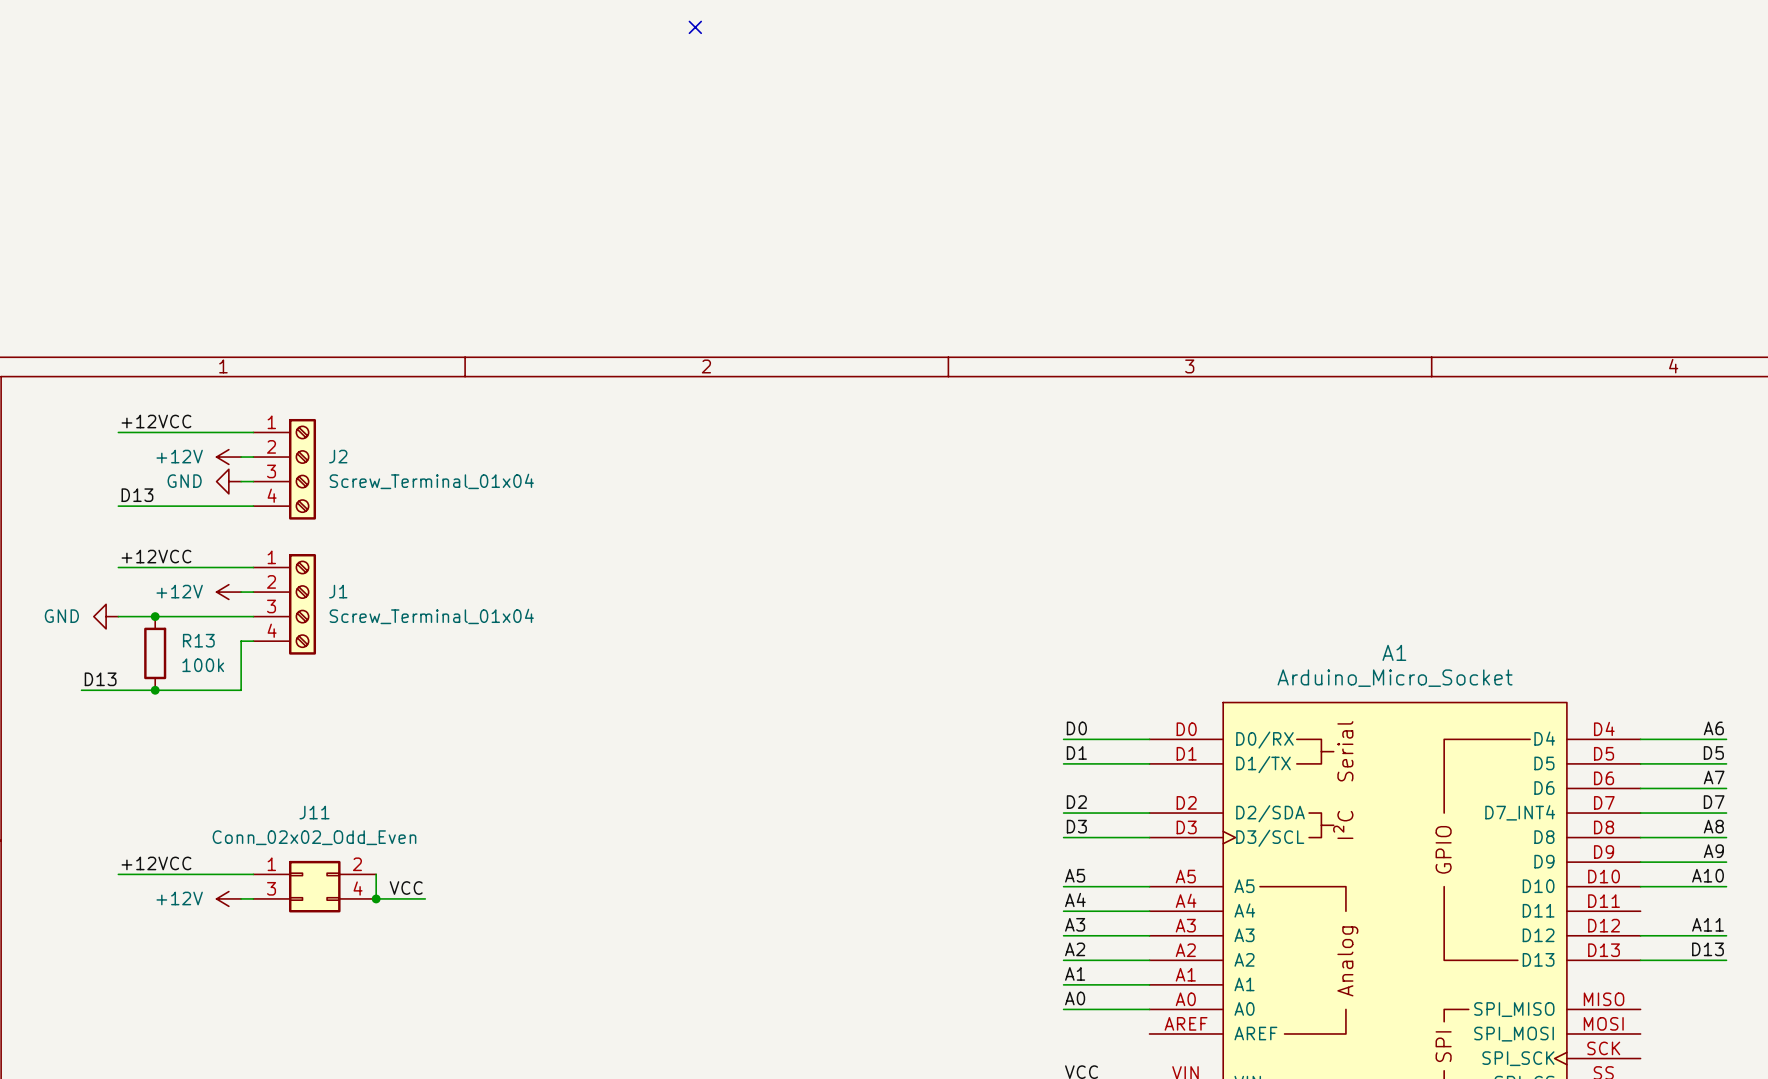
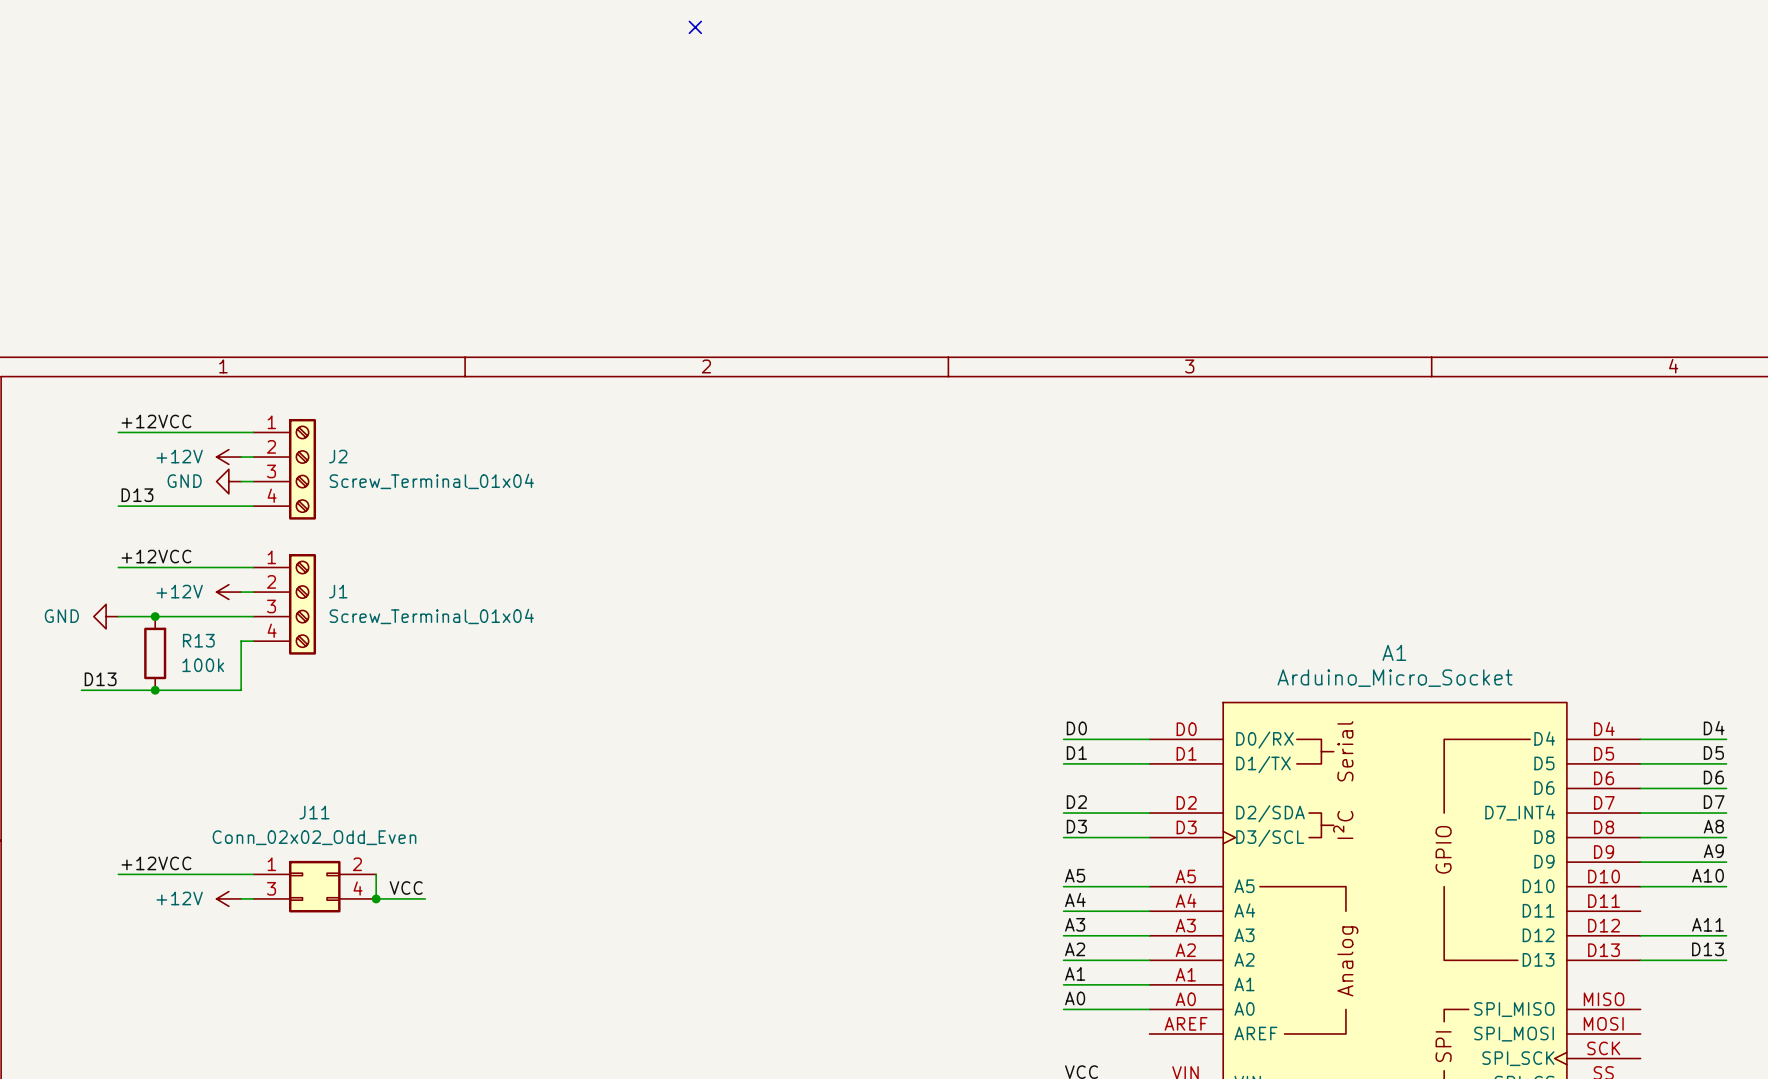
label: A6 (1713, 728) -> D4 (1714, 728)
label: A7 (1714, 777) -> D6 (1713, 777)

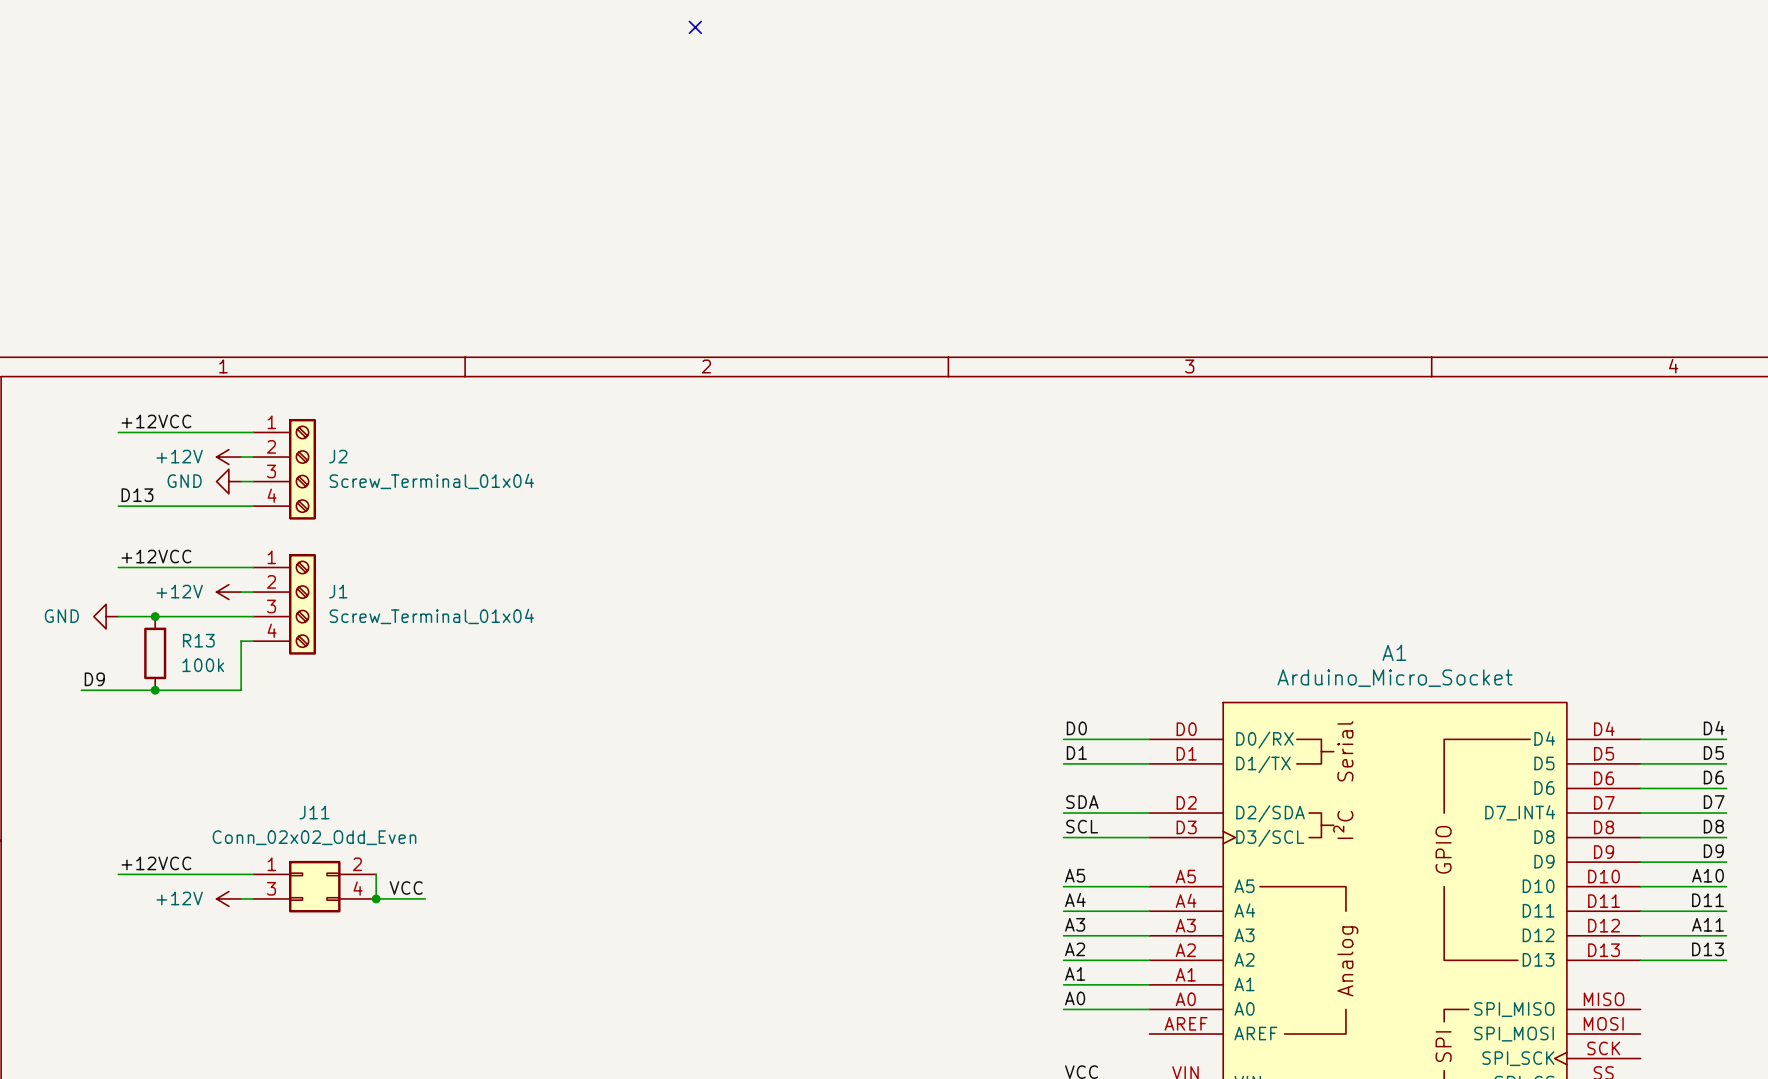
label: D13 (100, 679) -> D9 (94, 679)
label: D2 (1076, 802) -> SDA (1082, 802)
label: D3 (1076, 826) -> SCL (1082, 826)
label: A8 (1713, 826) -> D8 (1713, 826)
label: A9 (1713, 851) -> D9 (1713, 851)
label: none -> D11 (1707, 900)
wire: none -> (1640, 911) (1726, 911)

